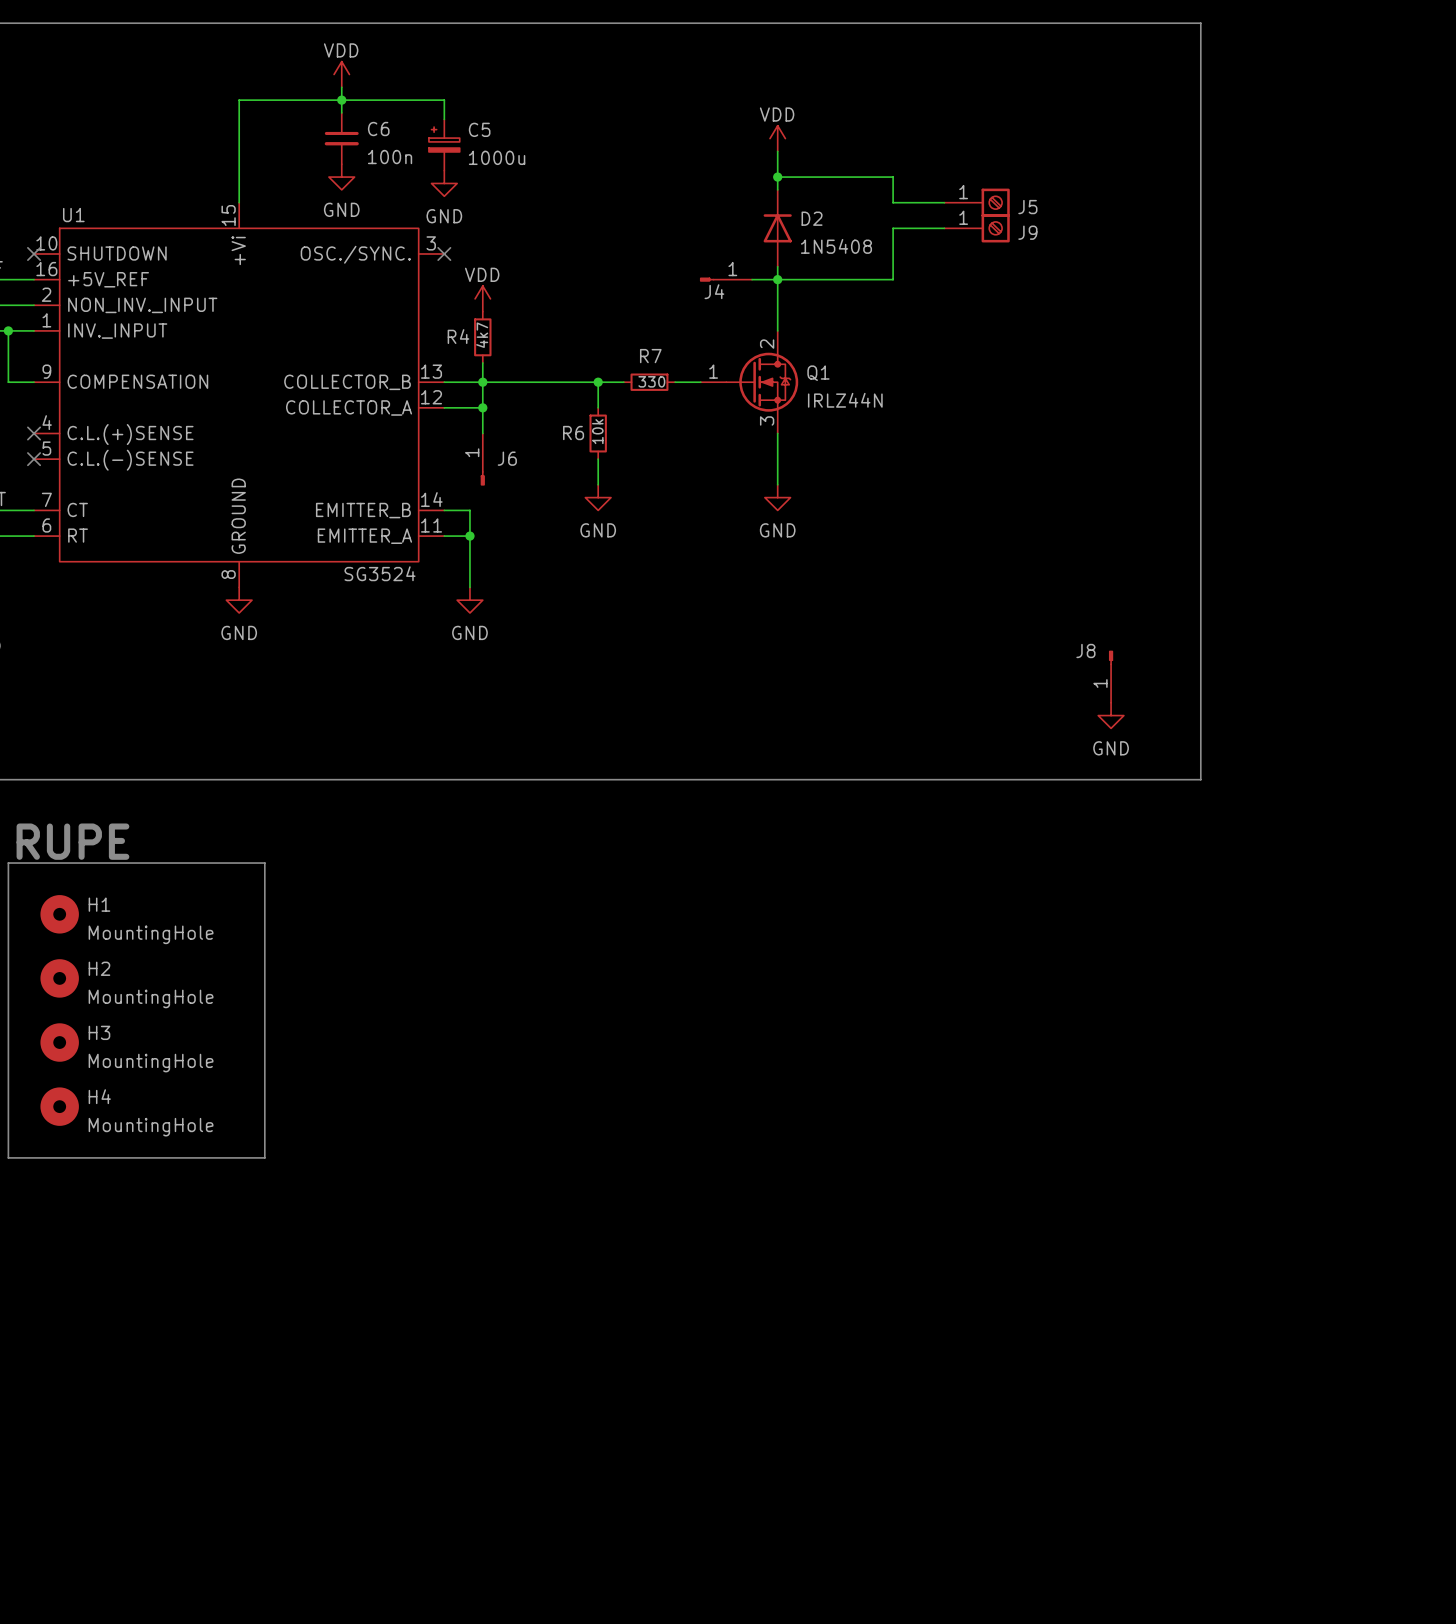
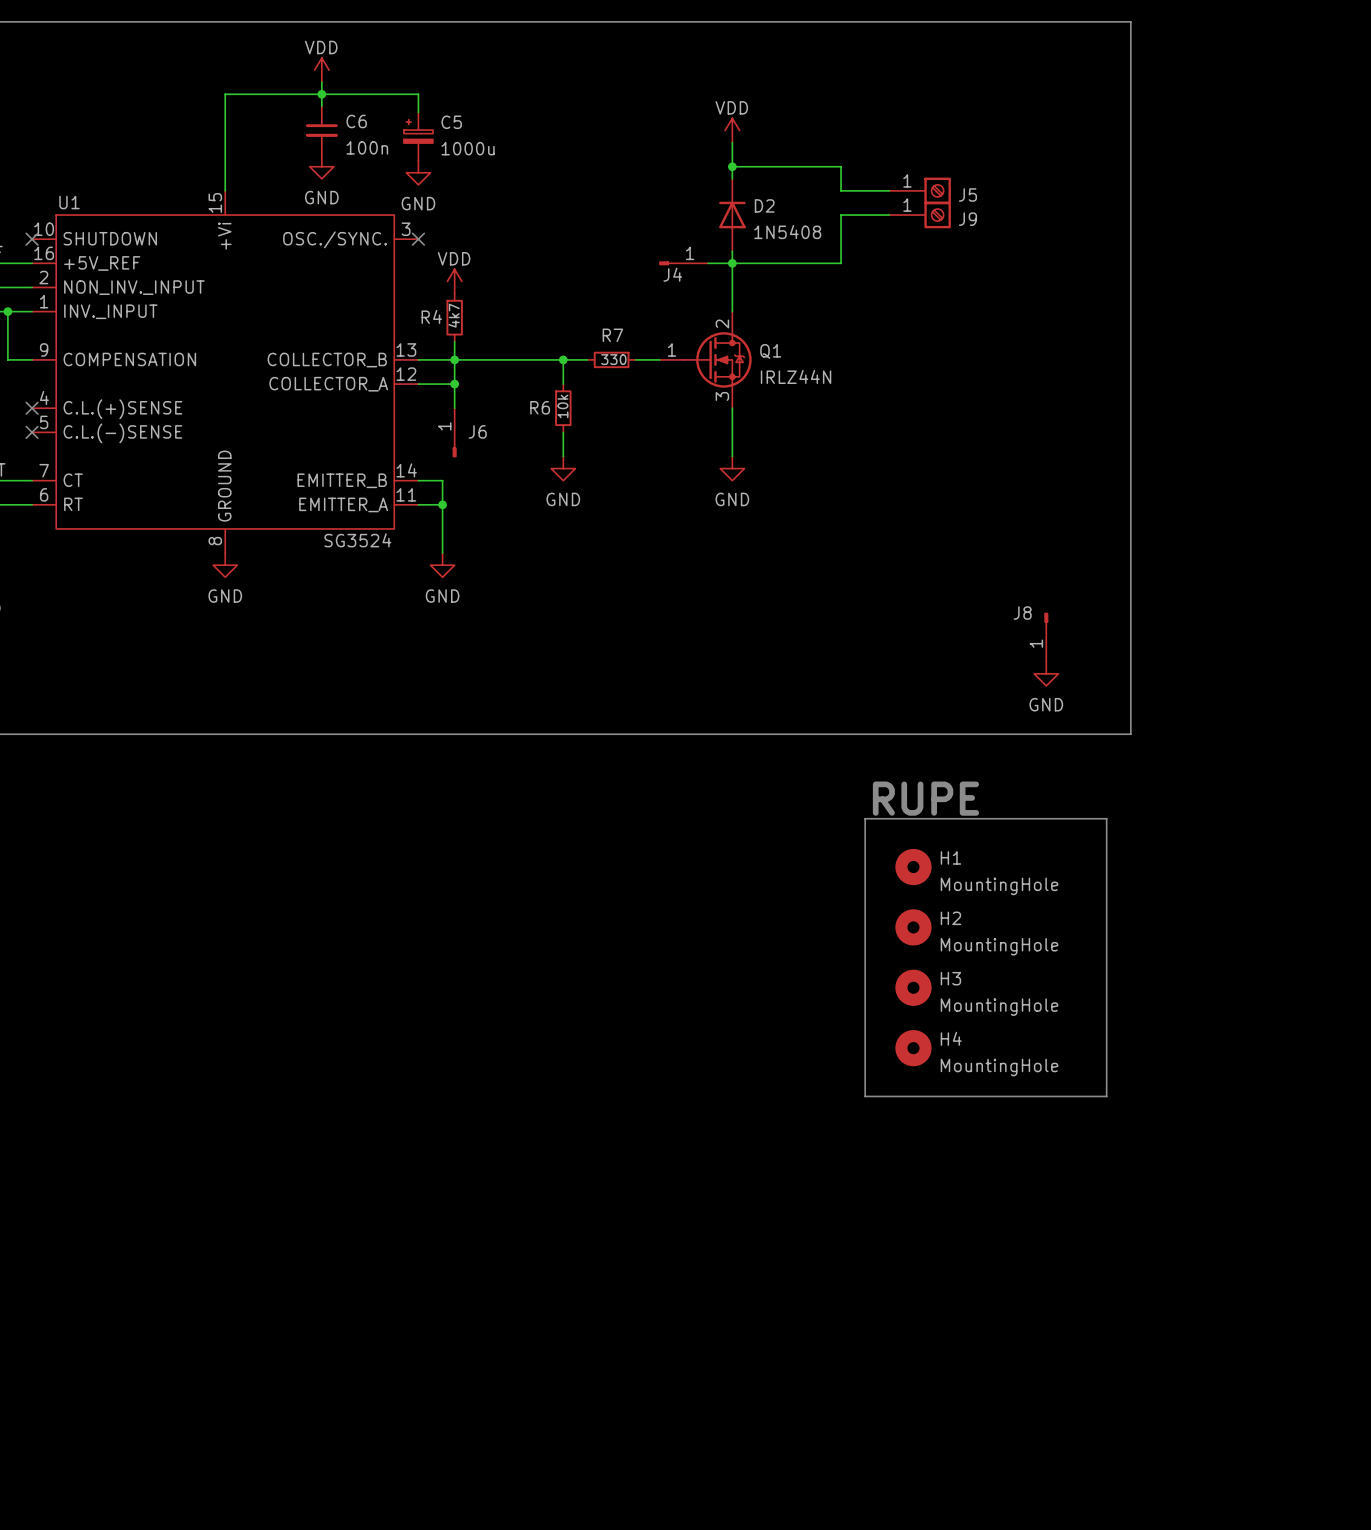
text: RUPE (72, 841) -> none
text: none -> RUPE (925, 798)
line: (8, 863) (8, 1157) (264, 1157) (264, 863) (8, 863) -> none
line: none -> (865, 818) (865, 1096) (1106, 1096) (1106, 818) (865, 818)
H1 position: (59, 914) -> (913, 867)
H2 position: (59, 978) -> (913, 927)
H3 position: (59, 1042) -> (913, 987)
H4 position: (59, 1106) -> (913, 1048)

